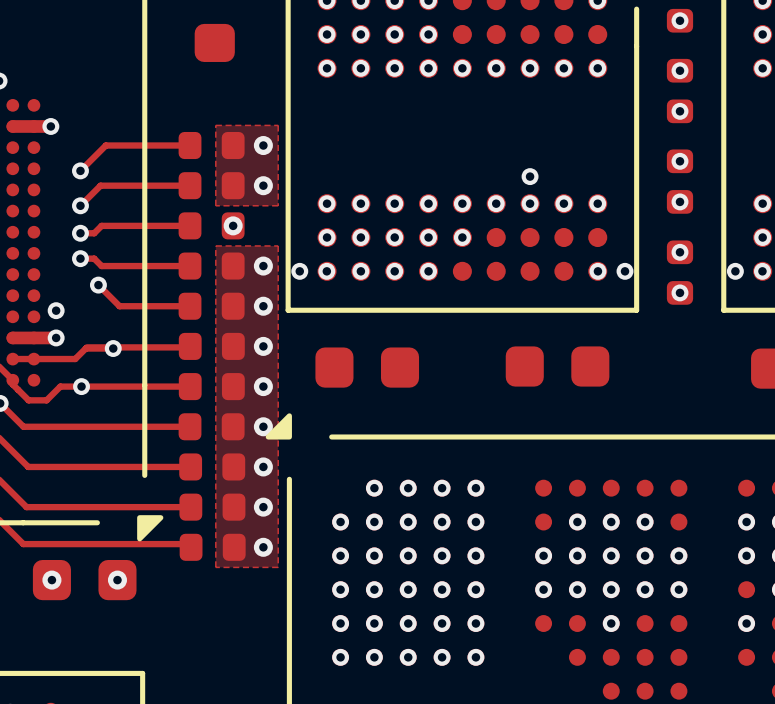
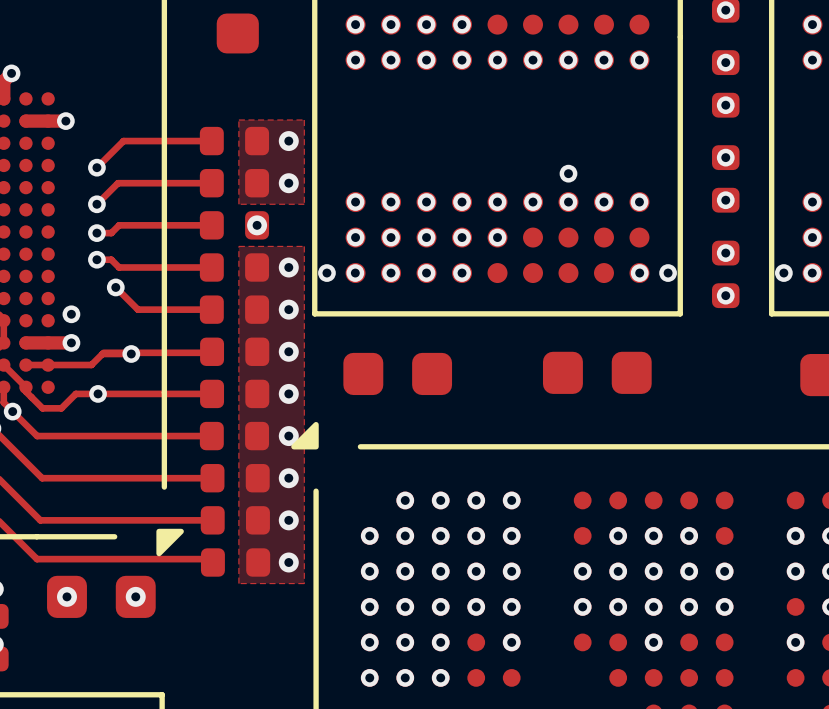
via: (442, 623) -> none
via: (442, 657) -> none
via: (475, 657) -> none

